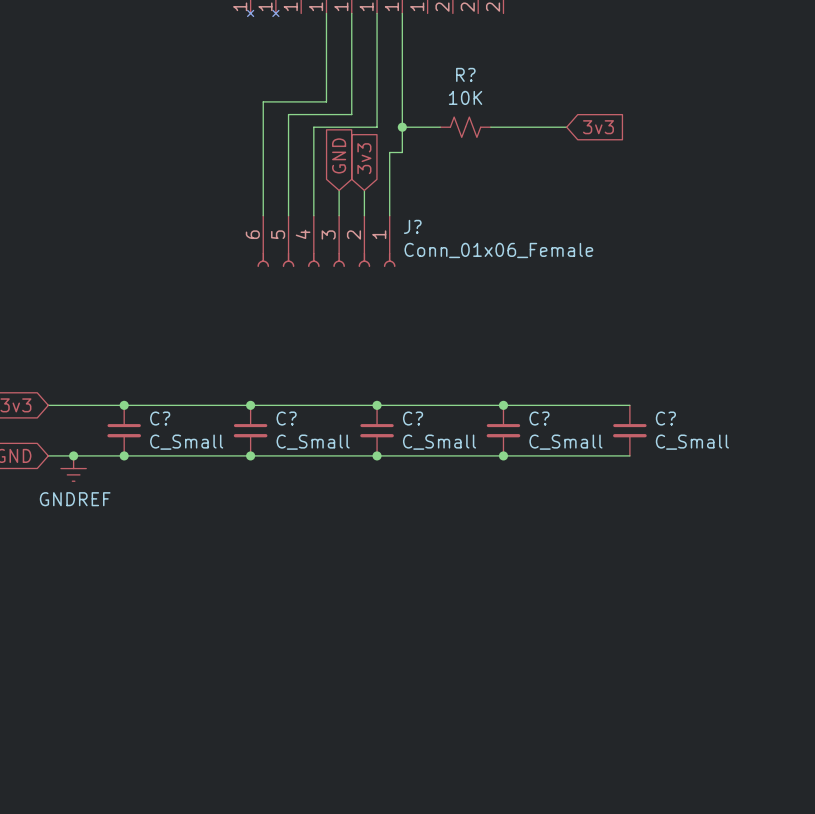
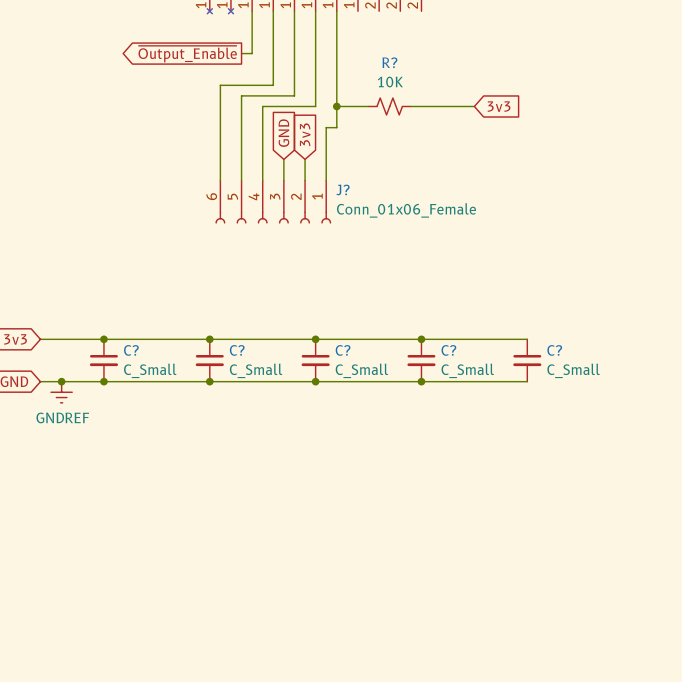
wire: none -> (252, 11) (252, 53) (241, 53)
global label: none -> ~{Output_Enable} (187, 54)

